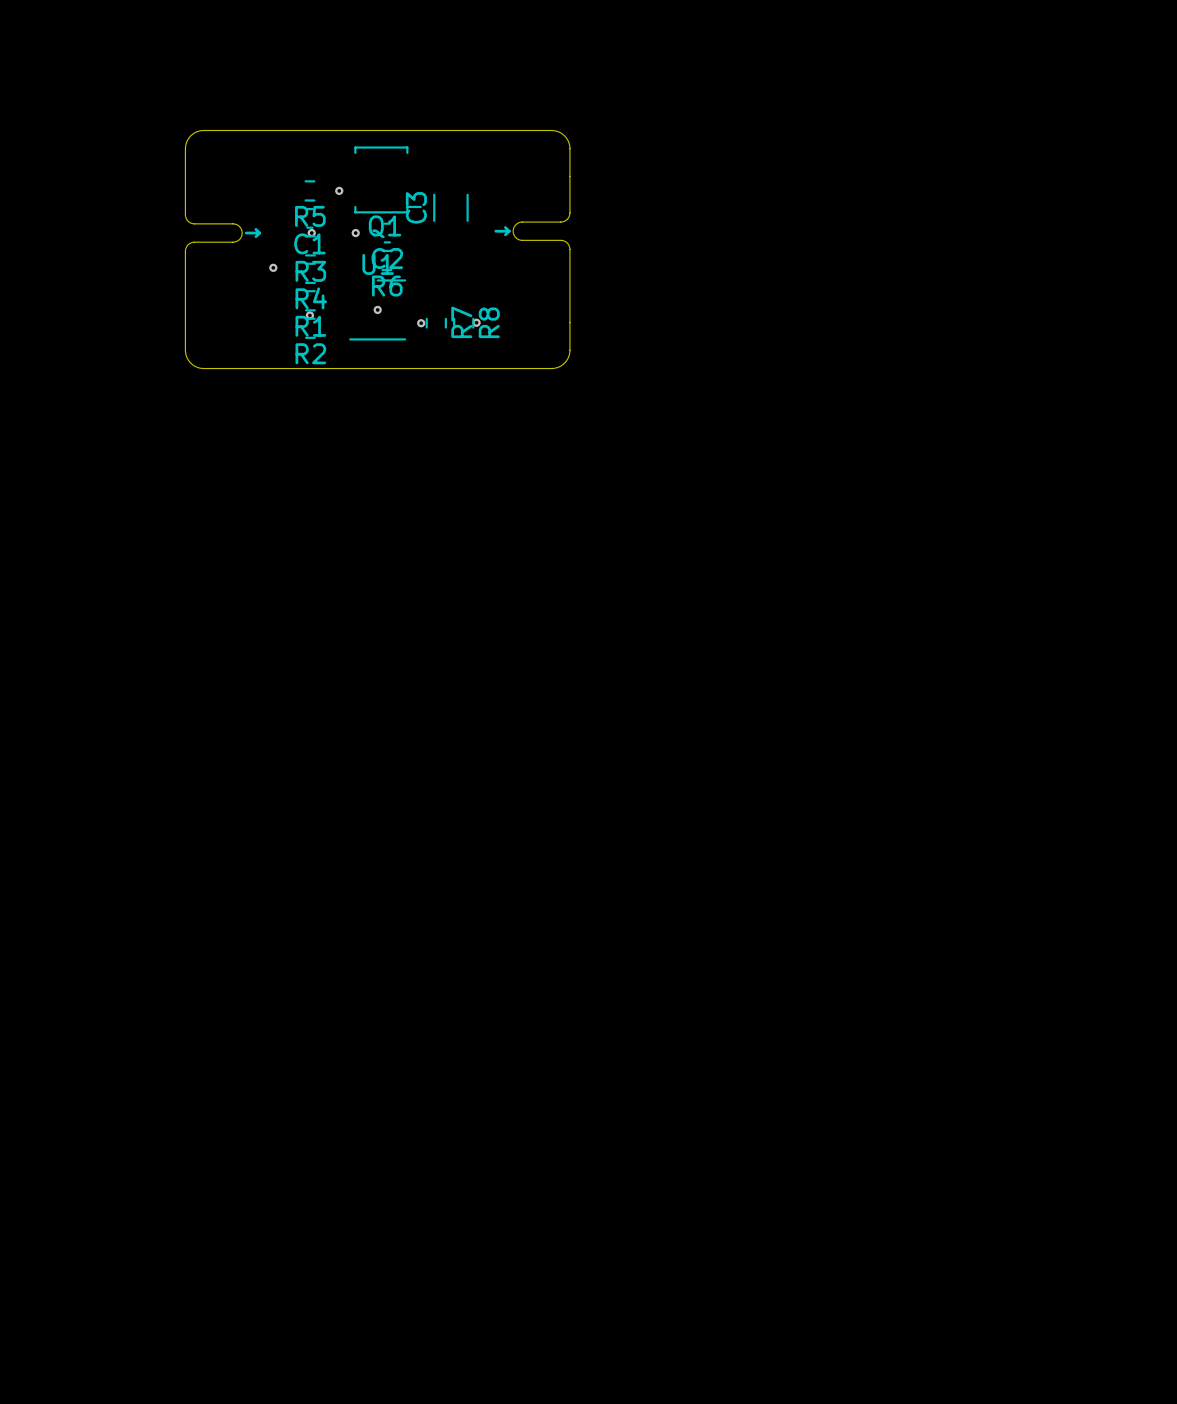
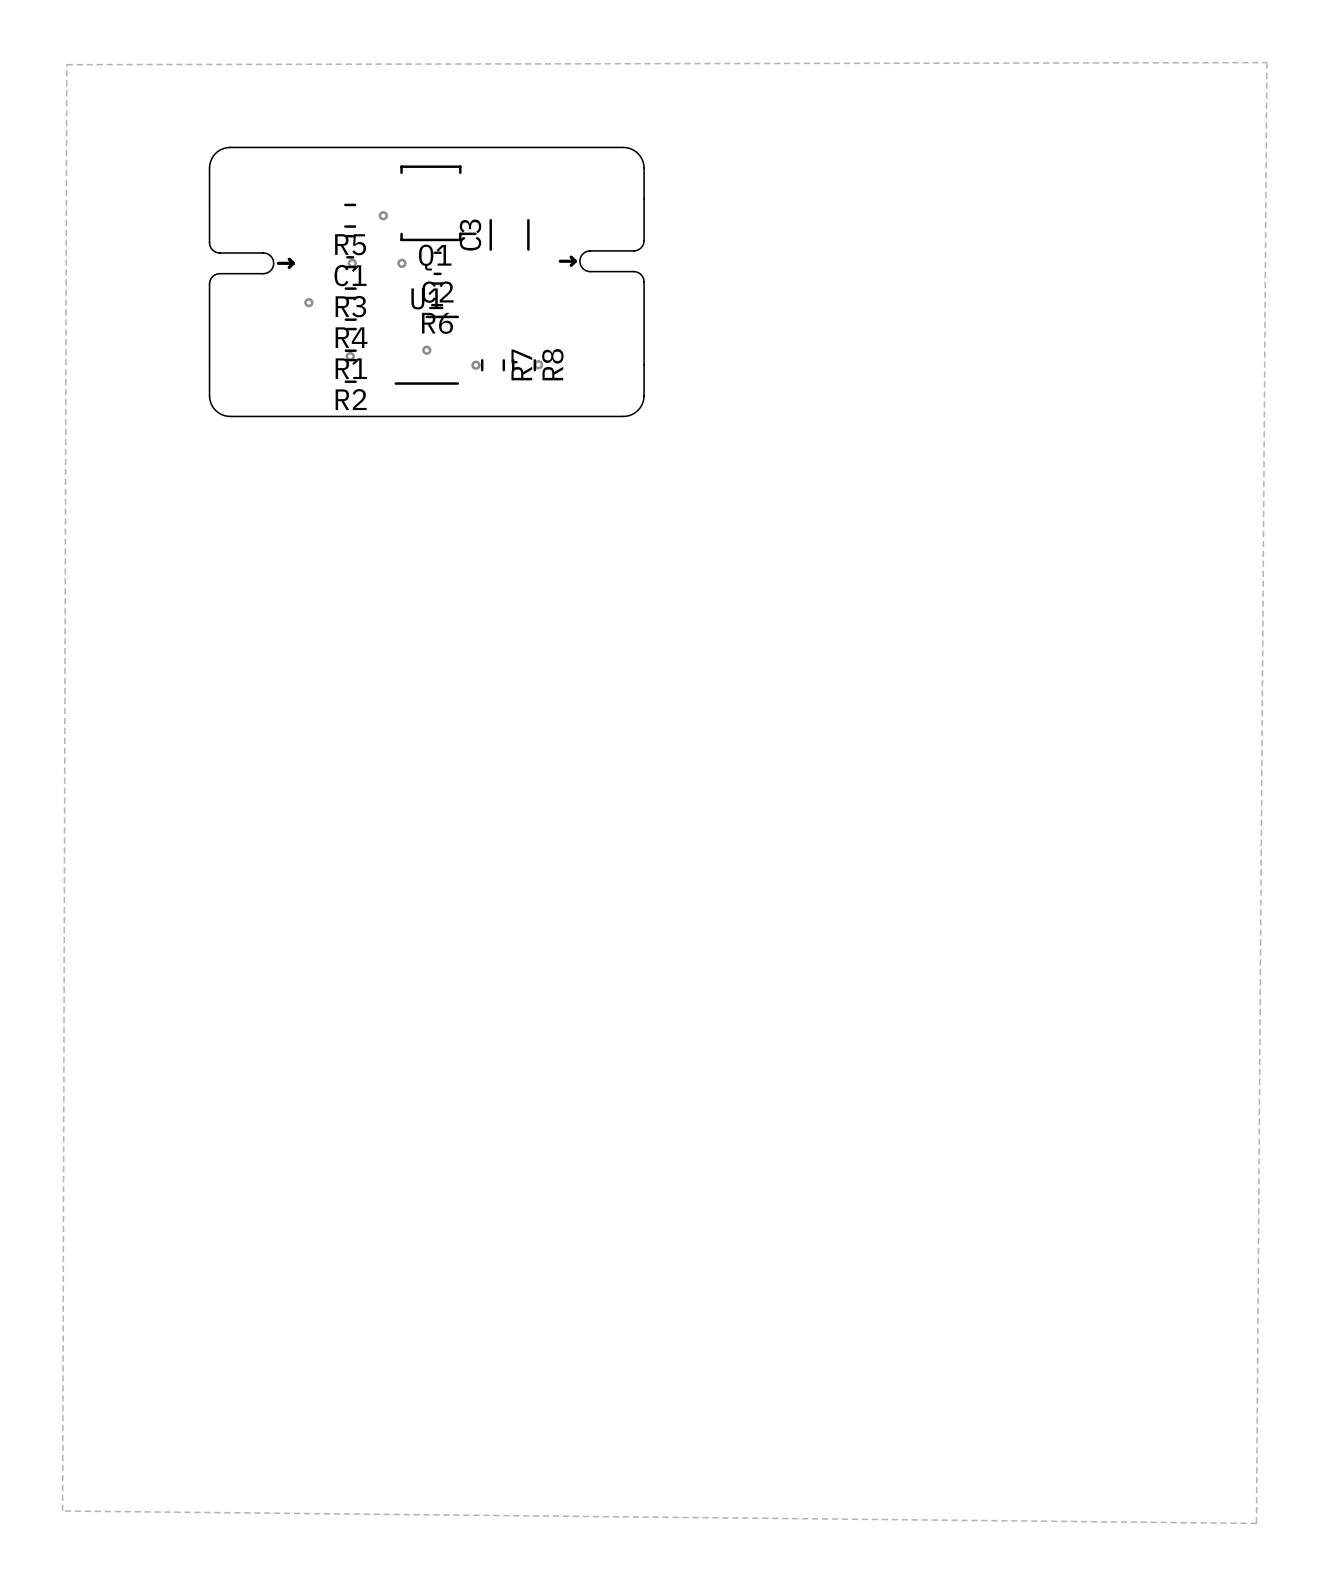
zone outline: none -> (1266, 62) (66, 64) (62, 1511) (1256, 1523) (1266, 62)

